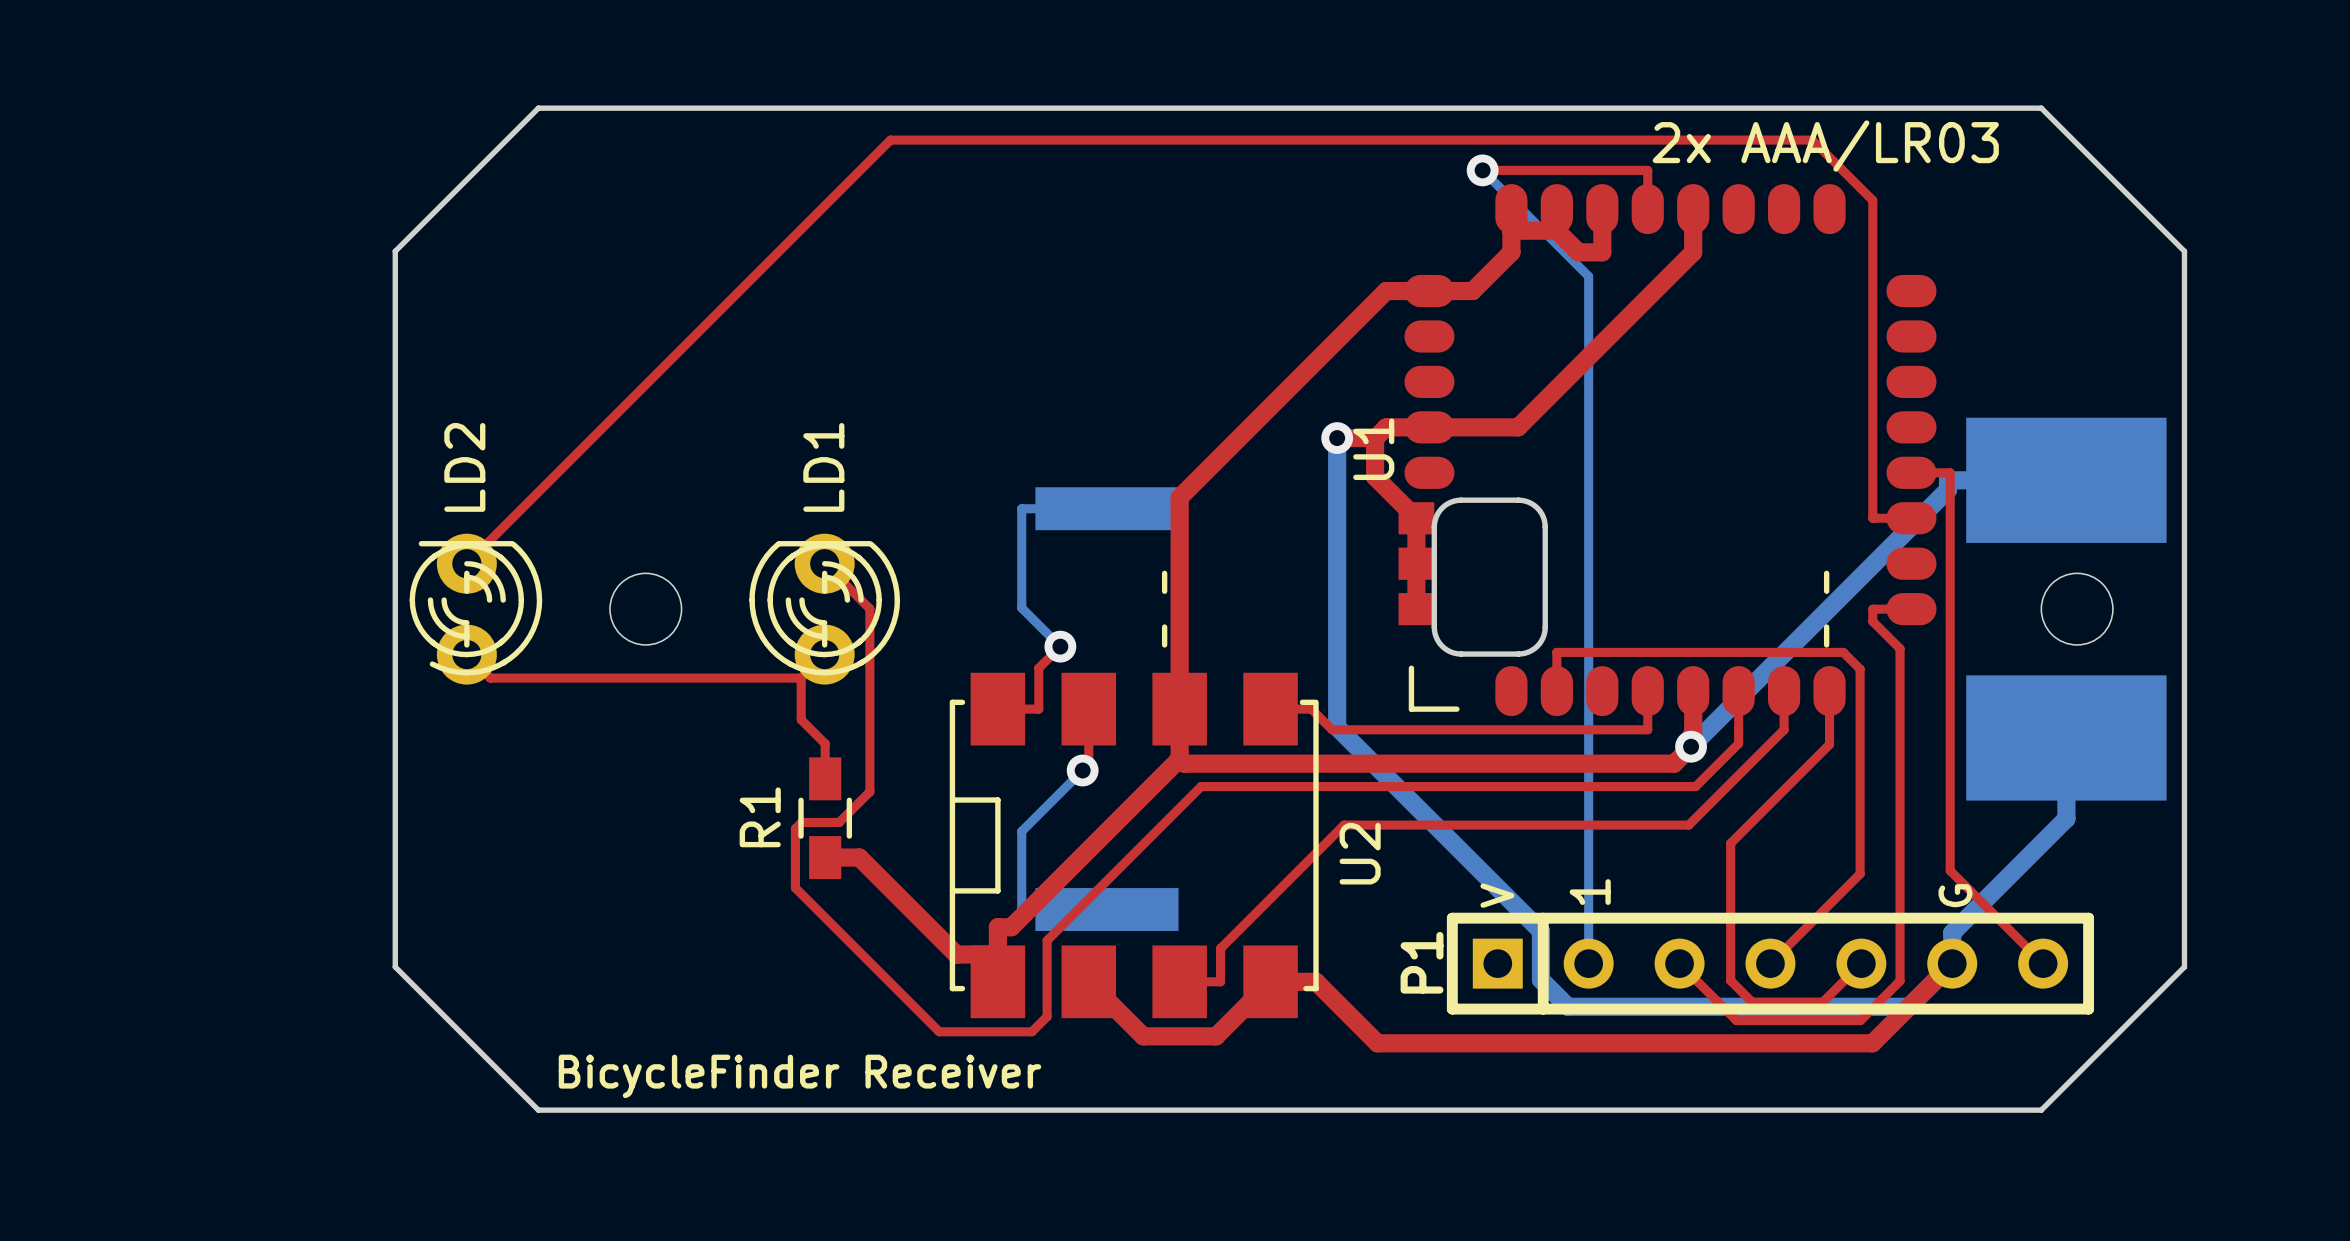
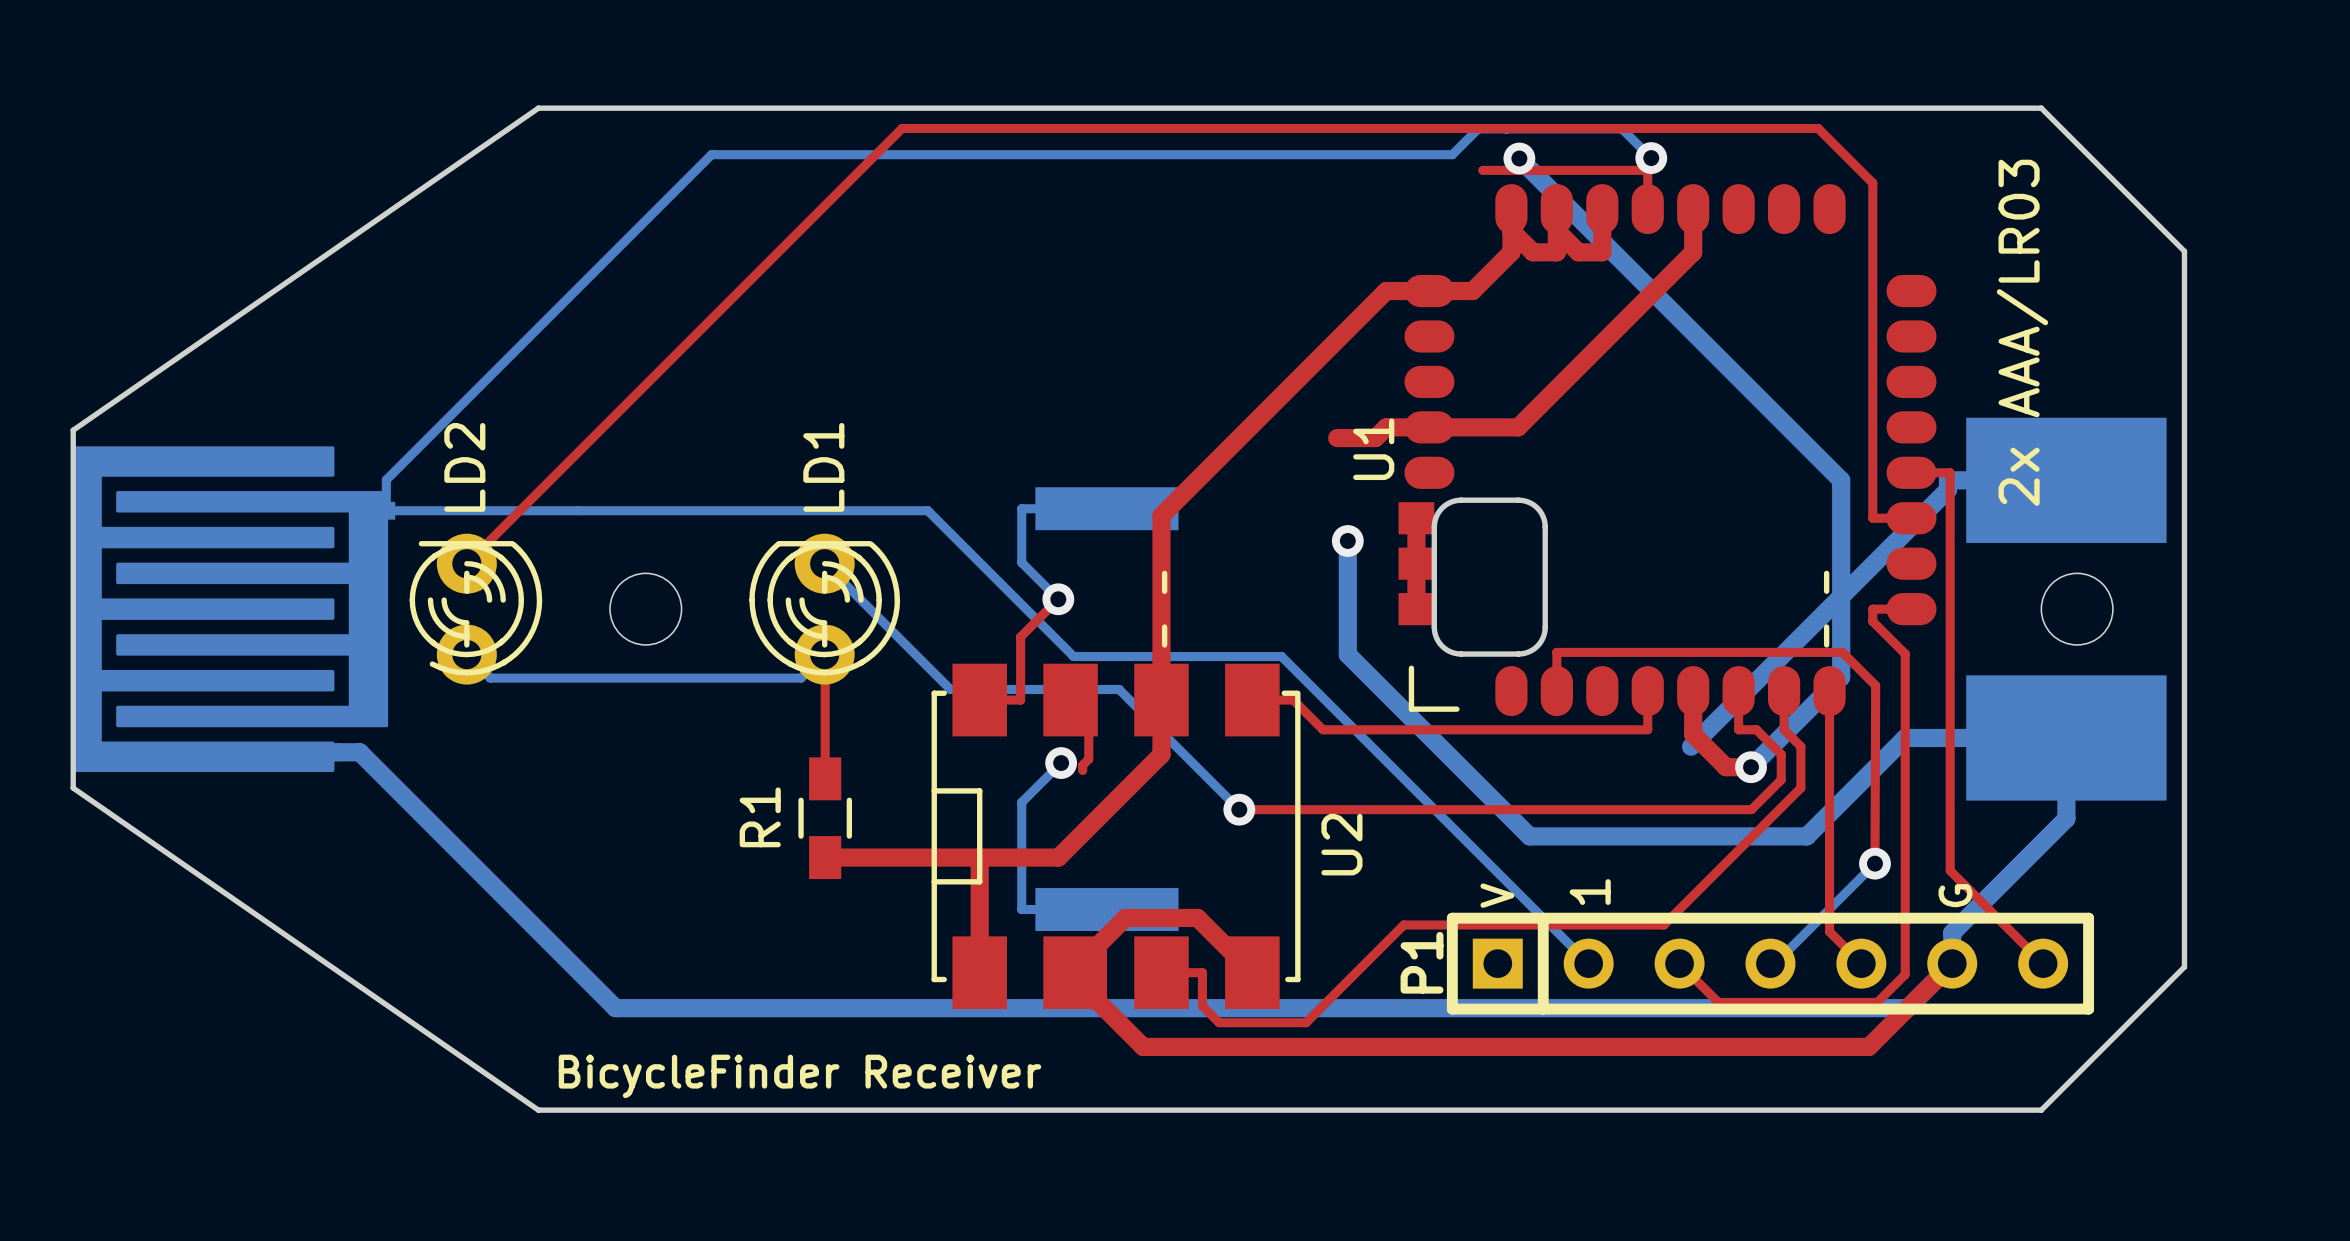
top track: (890, 140) (1812, 140) (1872, 200) -> (890, 140) (902, 128) (1818, 128) (1872, 183) (1872, 200)
bottom track: none -> (1519, 158) (1841, 480) (1841, 677) (1751, 767)
via: none -> (1651, 158)
bottom track: (1482, 170) (1588, 276) (1588, 963) -> (1651, 158) (1622, 128) (1478, 128) (1452, 154) (711, 154) (386, 479) (386, 510) (927, 510) (1073, 656) (1281, 656) (1588, 963)
via position: (1482, 170) -> (1519, 158)
top track: (1511, 230) (1556, 230) -> (1511, 230) (1533, 252) (1556, 252) (1556, 230)
bottom track: (1337, 438) (1337, 727) (1540, 931) (1540, 979) (1567, 1006) (1909, 1006) -> (332, 752) (359, 752) (615, 1008) (1909, 1006)
via position: (1337, 438) -> (1347, 540)
top track: (1375, 438) (1375, 476) (1416, 518) -> none
top track: (1179, 497) (1179, 758) -> (1179, 497) (1161, 515) (1161, 754) (1058, 857) (859, 857)
bottom track: none -> (1347, 540) (1347, 654) (1529, 836) (1806, 836) (1905, 737) (2066, 737)
bottom track: (1021, 562) (1021, 608) (1060, 646) -> (1021, 562) (1058, 599)
top track: (824, 563) (869, 608) (869, 791) (839, 822) (801, 822) (795, 828) (795, 887) (939, 1031) (1031, 1031) (1047, 1016) (1047, 940) (1201, 786) (1695, 786) (1738, 743) (1738, 729) -> (1239, 809) (1751, 809) (1781, 779) (1781, 754) (1756, 729) (1738, 729)
bottom track: none -> (824, 563) (950, 689) (1119, 689) (1239, 809)
top track: none -> (1058, 599) (1020, 636) (1020, 700) (979, 700)
part: none -> (233, 609)
part: none -> 2x AAA/LR03 (1128, 609)
part: 2x AAA/LR03 (1289, 609) -> none
top track: (1060, 646) (1038, 668) (1038, 709) (997, 709) -> none
via position: (1060, 646) -> (1058, 599)
top track: (1900, 648) (1900, 981) (1860, 1020) (1736, 1020) (1718, 1002) -> (1900, 648) (1905, 653) (1905, 974) (1877, 1002) (1822, 1002)
top track: (1842, 652) (1860, 669) (1860, 873) (1770, 963) -> (1842, 652) (1875, 685) (1874, 863)
top track: (466, 654) (490, 678) (801, 678) -> none
bottom track: none -> (466, 654) (490, 678) (801, 678) (824, 654)
top track: (801, 678) (801, 719) (825, 743) -> (825, 655) (825, 743)
top track: (1270, 709) (1311, 709) (1332, 729) -> (1252, 700) (1293, 700) (1323, 729) (1332, 729)
top track: (1784, 729) (1688, 825) (1344, 825) (1220, 948) (1220, 981) (1179, 981) -> (1784, 729) (1800, 746) (1800, 788) (1663, 924) (1403, 924) (1306, 1022) (1219, 1022) (1202, 1005) (1202, 972) (1161, 972)
top track: (1693, 734) (1691, 736) (1691, 746) (1674, 763) (1184, 763) (1179, 758) -> (1693, 734) (1726, 767) (1751, 767)
top track: (1829, 744) (1730, 843) (1730, 980) (1752, 1002) -> (1829, 744) (1829, 931) (1861, 963)
via position: (1691, 746) -> (1751, 767)
top track: (1179, 758) (1011, 927) (997, 927) (997, 981) -> none
bottom track: (1082, 770) (1021, 831) -> (1061, 763) (1021, 802) (1021, 831)
via position: (1082, 770) -> (1061, 763)
via: none -> (1239, 809)
U2 position: (1134, 845) -> (1116, 836)
top track: (859, 857) (956, 954) (997, 954) -> none
top track: none -> (979, 857) (979, 972)
bottom track: none -> (1874, 863) (1775, 963) (1770, 963)
via: none -> (1874, 863)
top track: (1861, 963) (1822, 1002) -> none
top track: (1088, 981) (1143, 1036) (1216, 1036) (1270, 981) (1316, 981) (1377, 1043) (1872, 1043) -> (1252, 972) (1197, 917) (1125, 917) (1097, 945) (1097, 1001) (1143, 1046) (1868, 1046) (1872, 1043)

